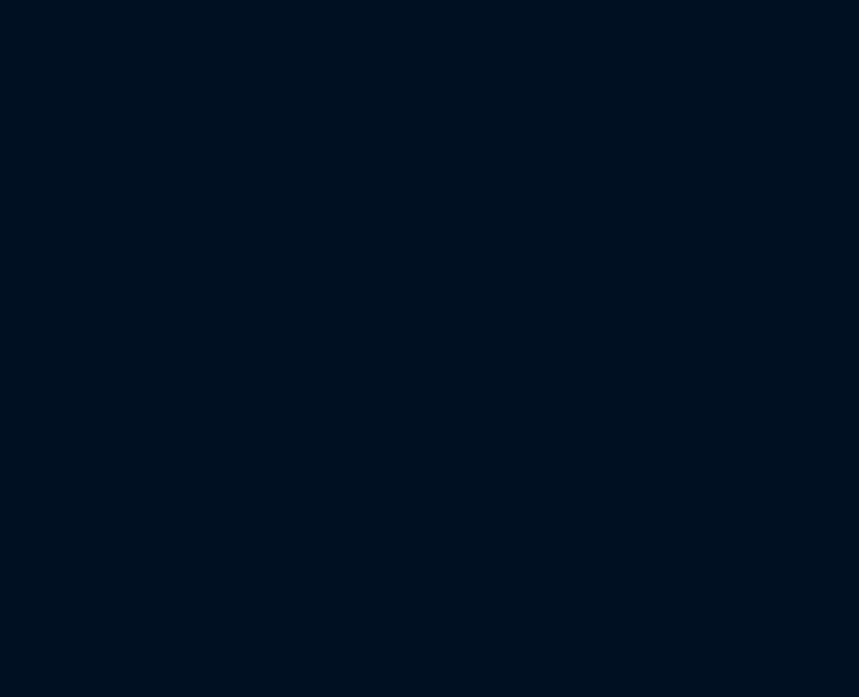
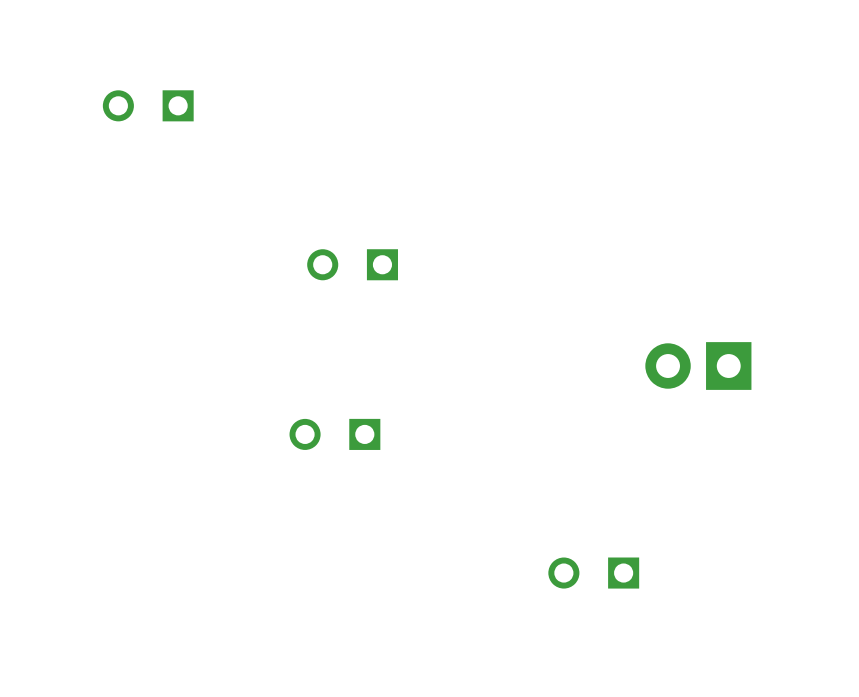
part: none -> (148, 105)
part: none -> (352, 264)
part: none -> (698, 366)
part: none -> (334, 434)
part: none -> (593, 573)

